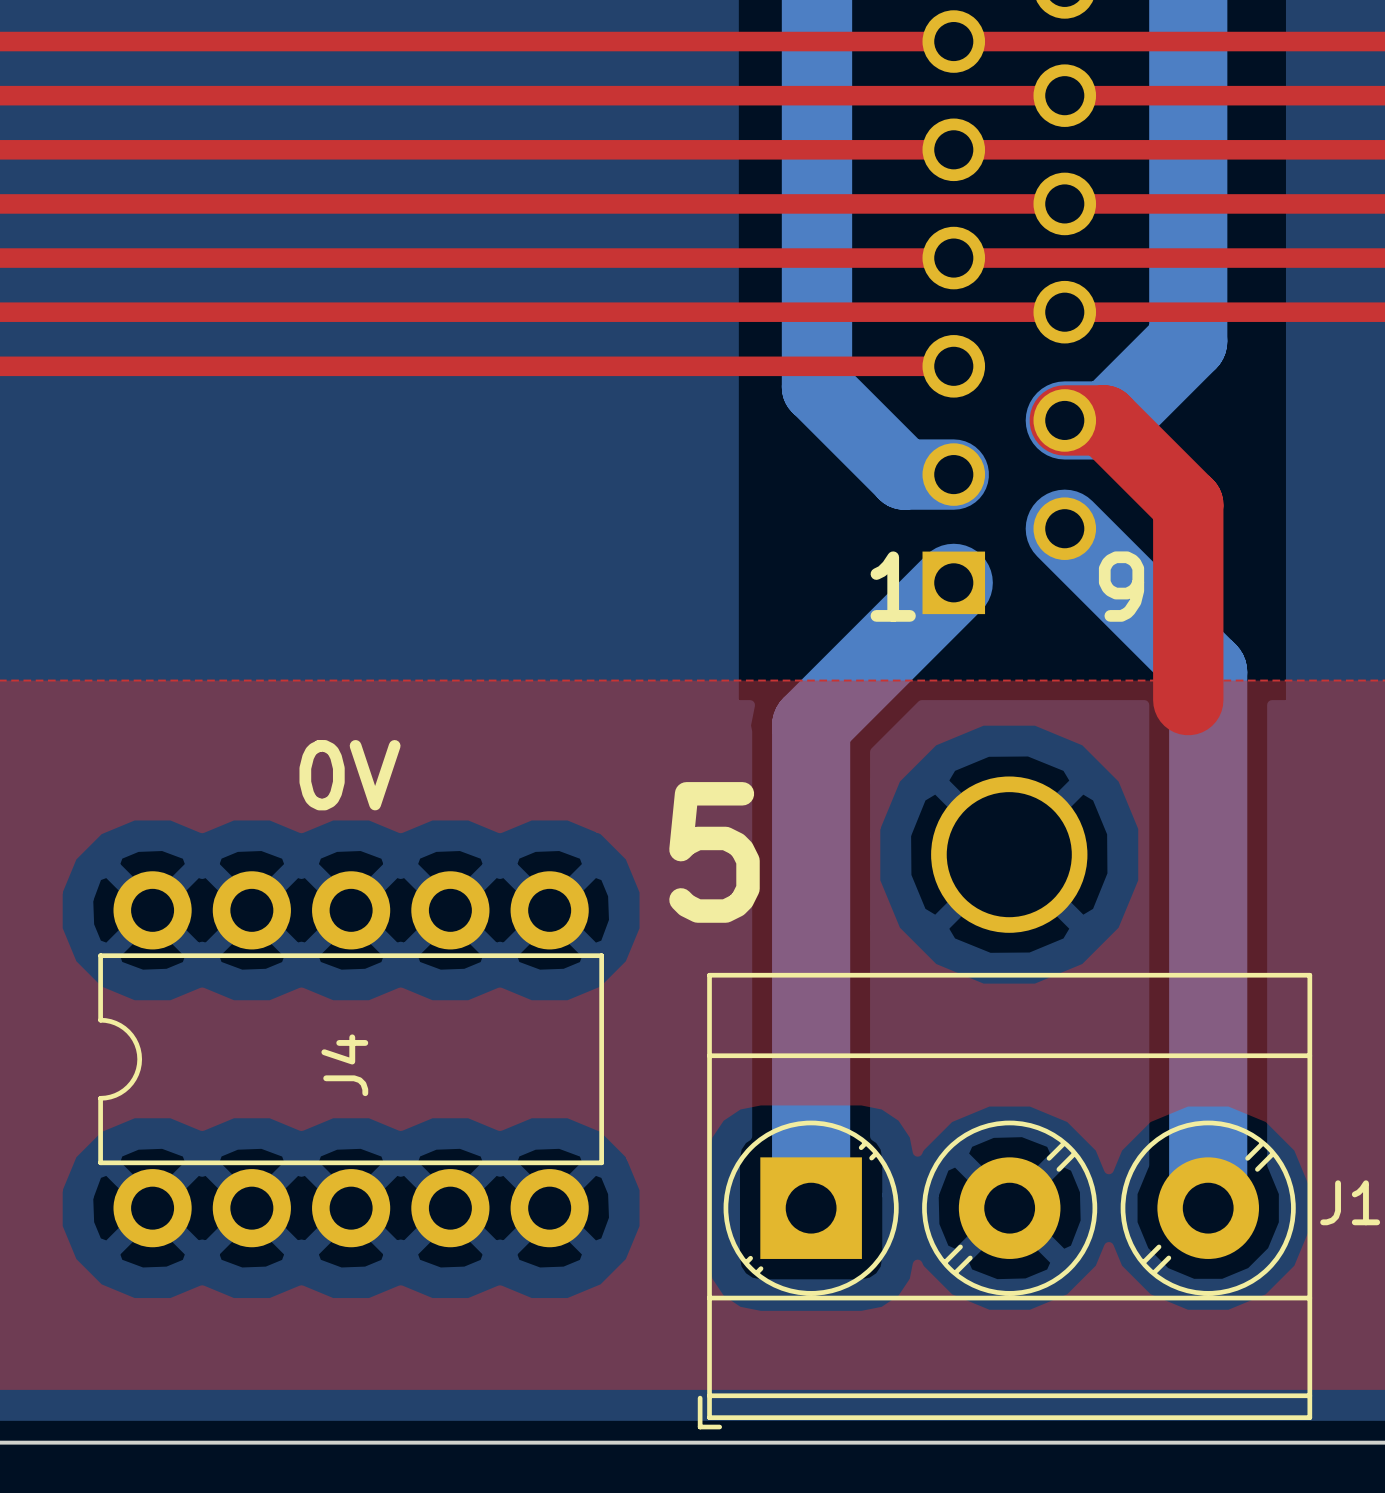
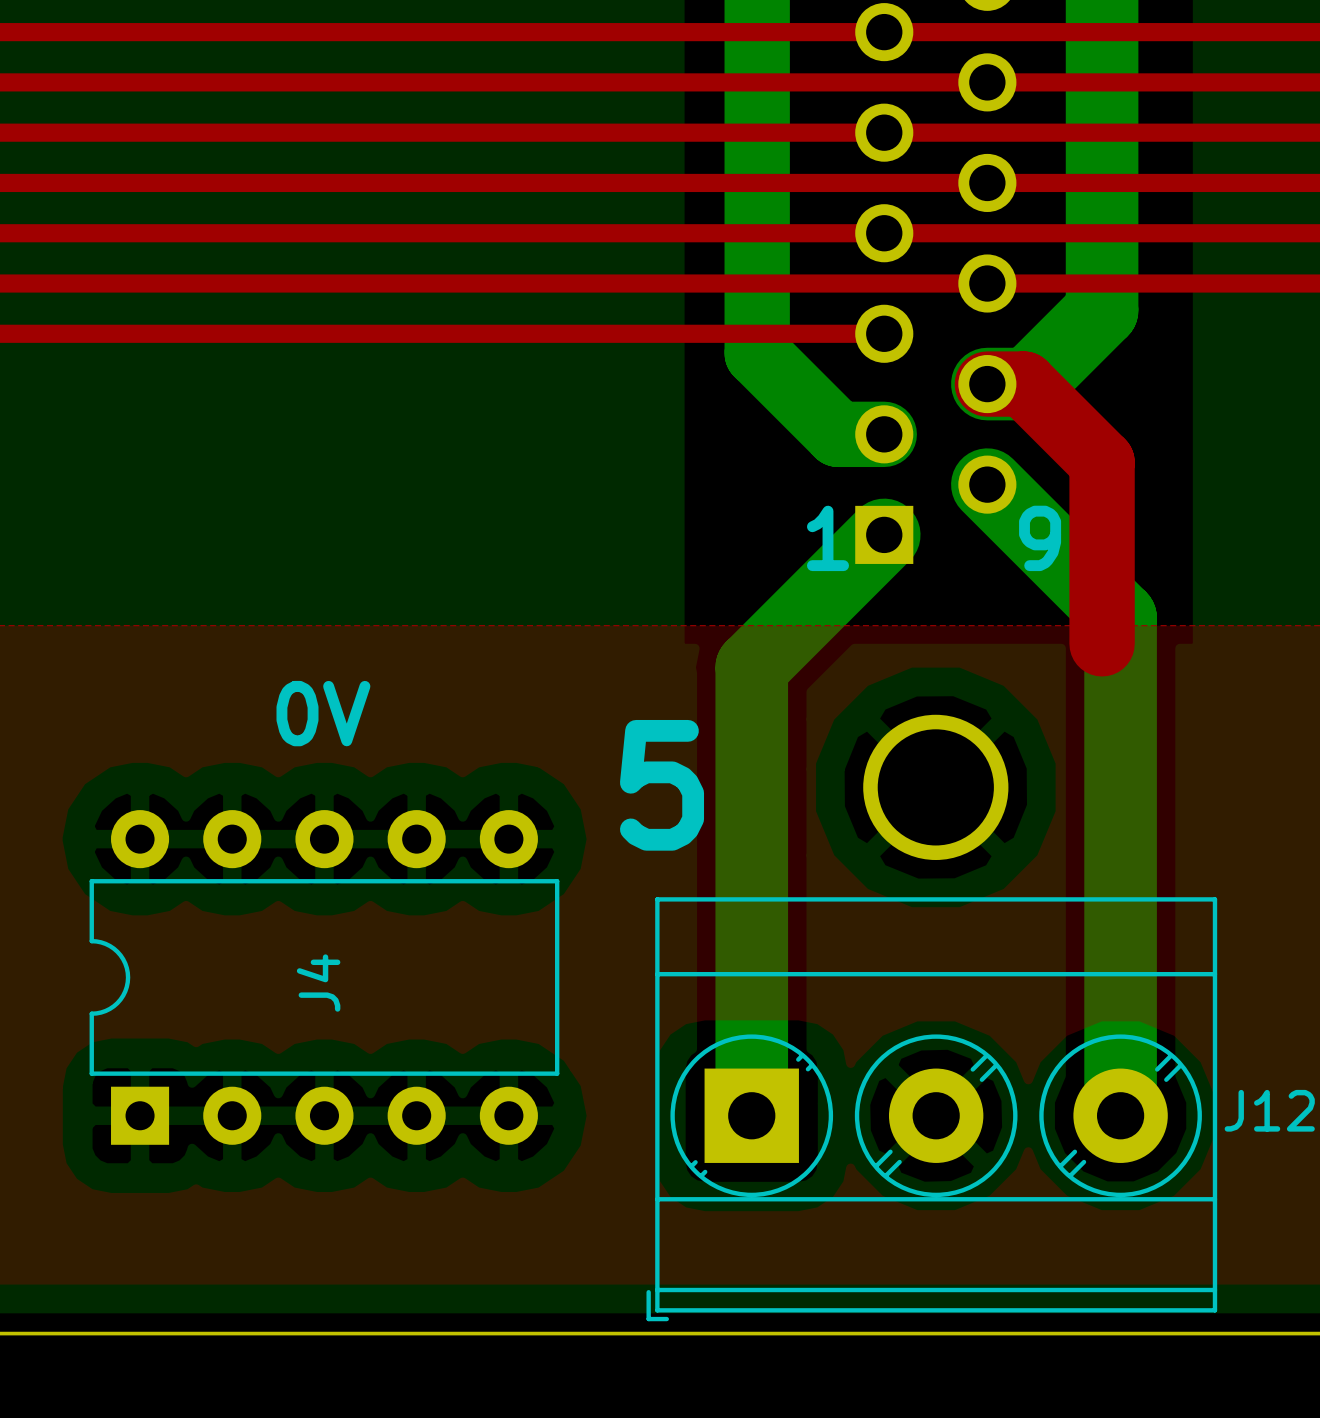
J4 footprint: [98, 871, 604, 1248] -> [89, 810, 560, 1145]

